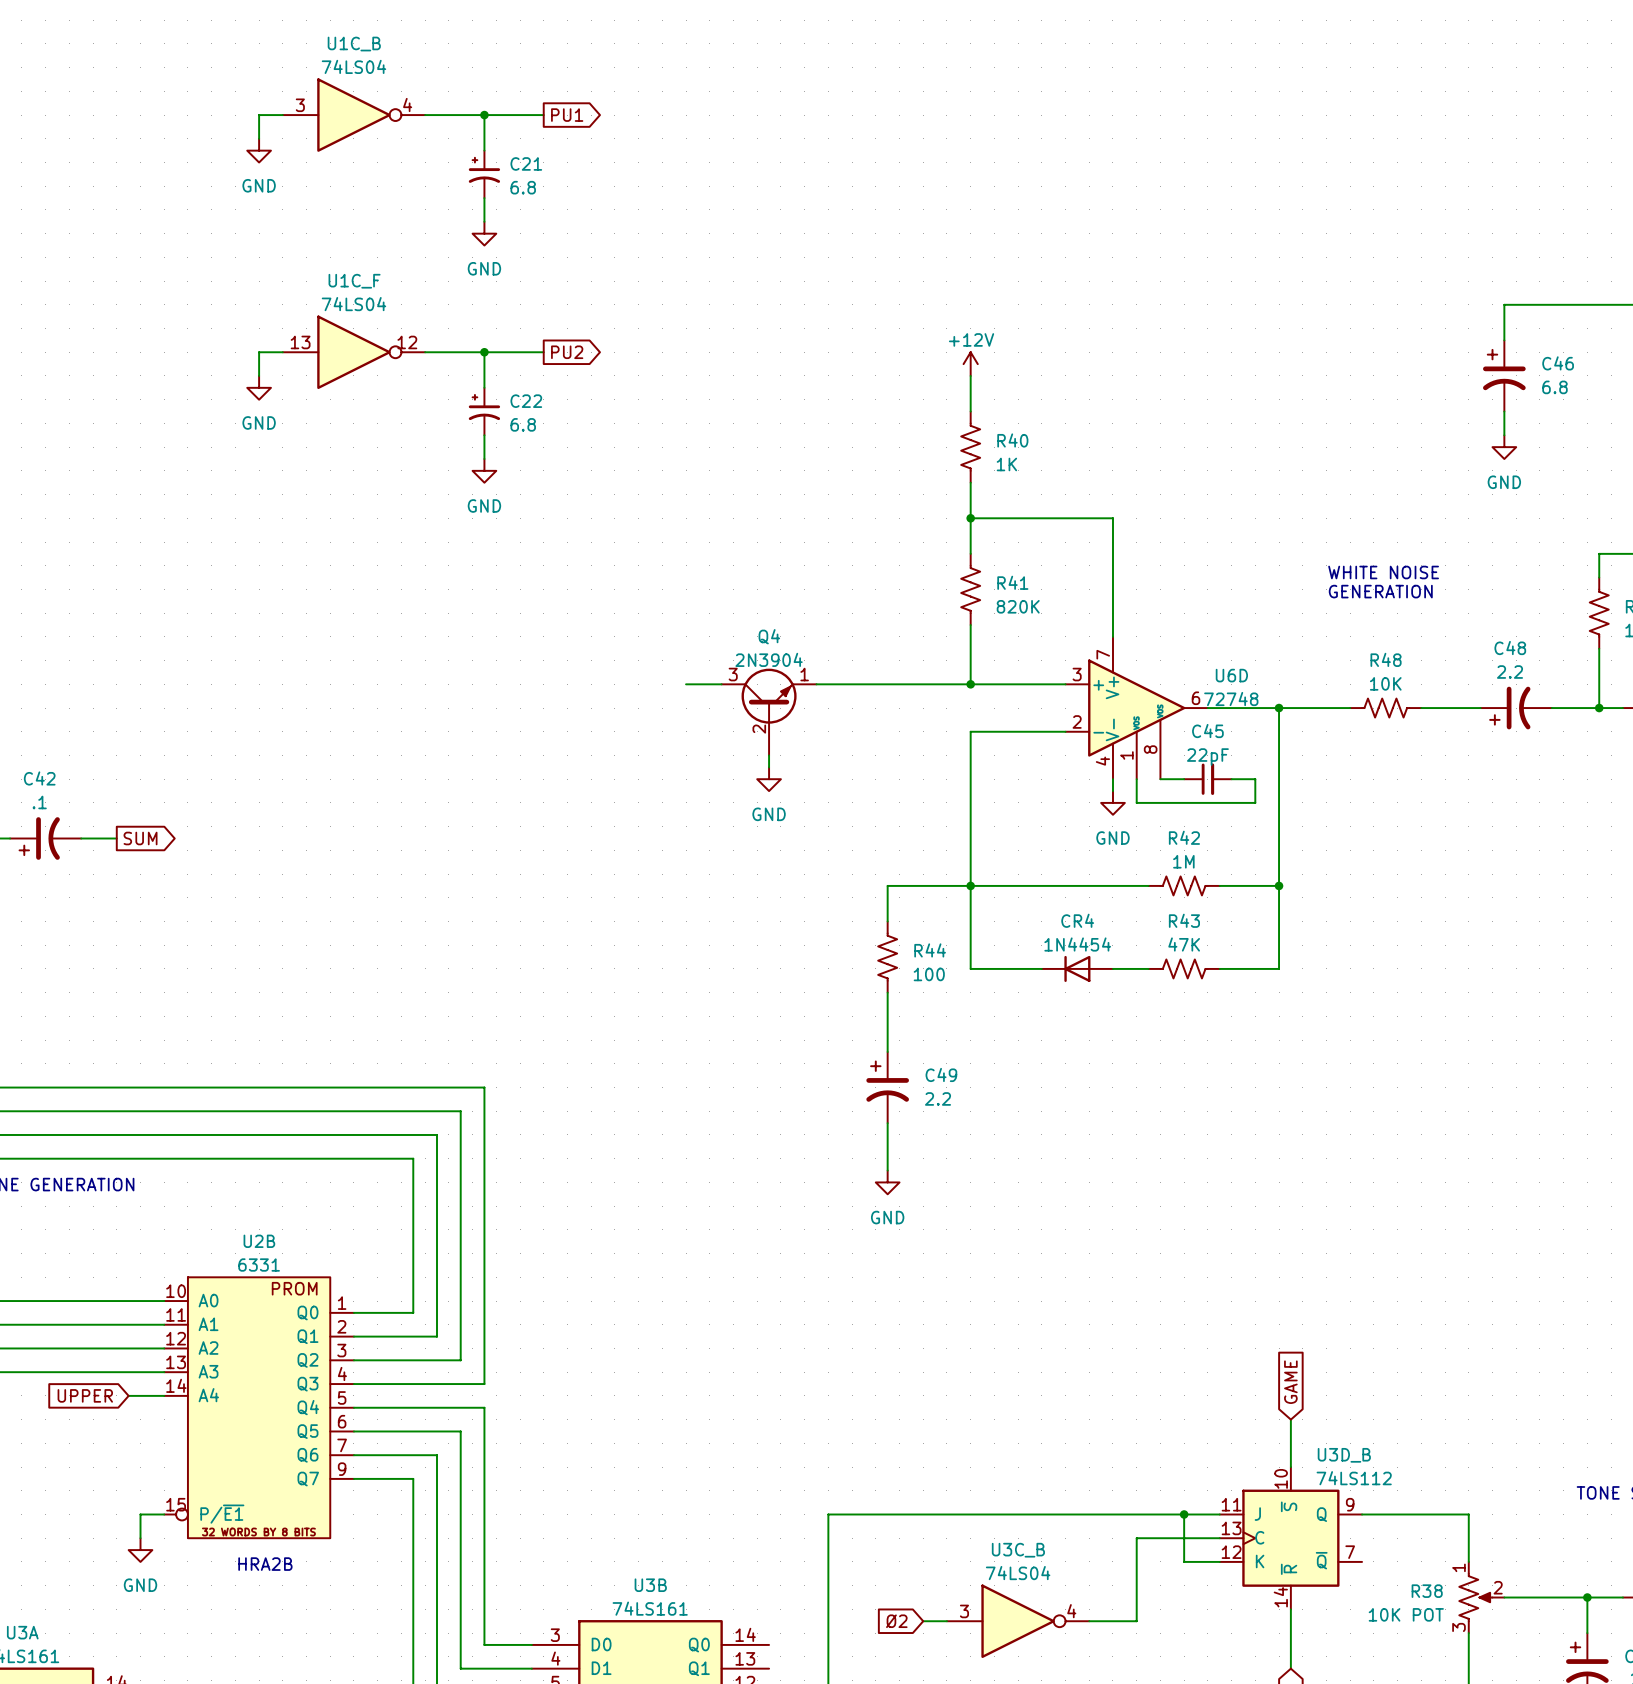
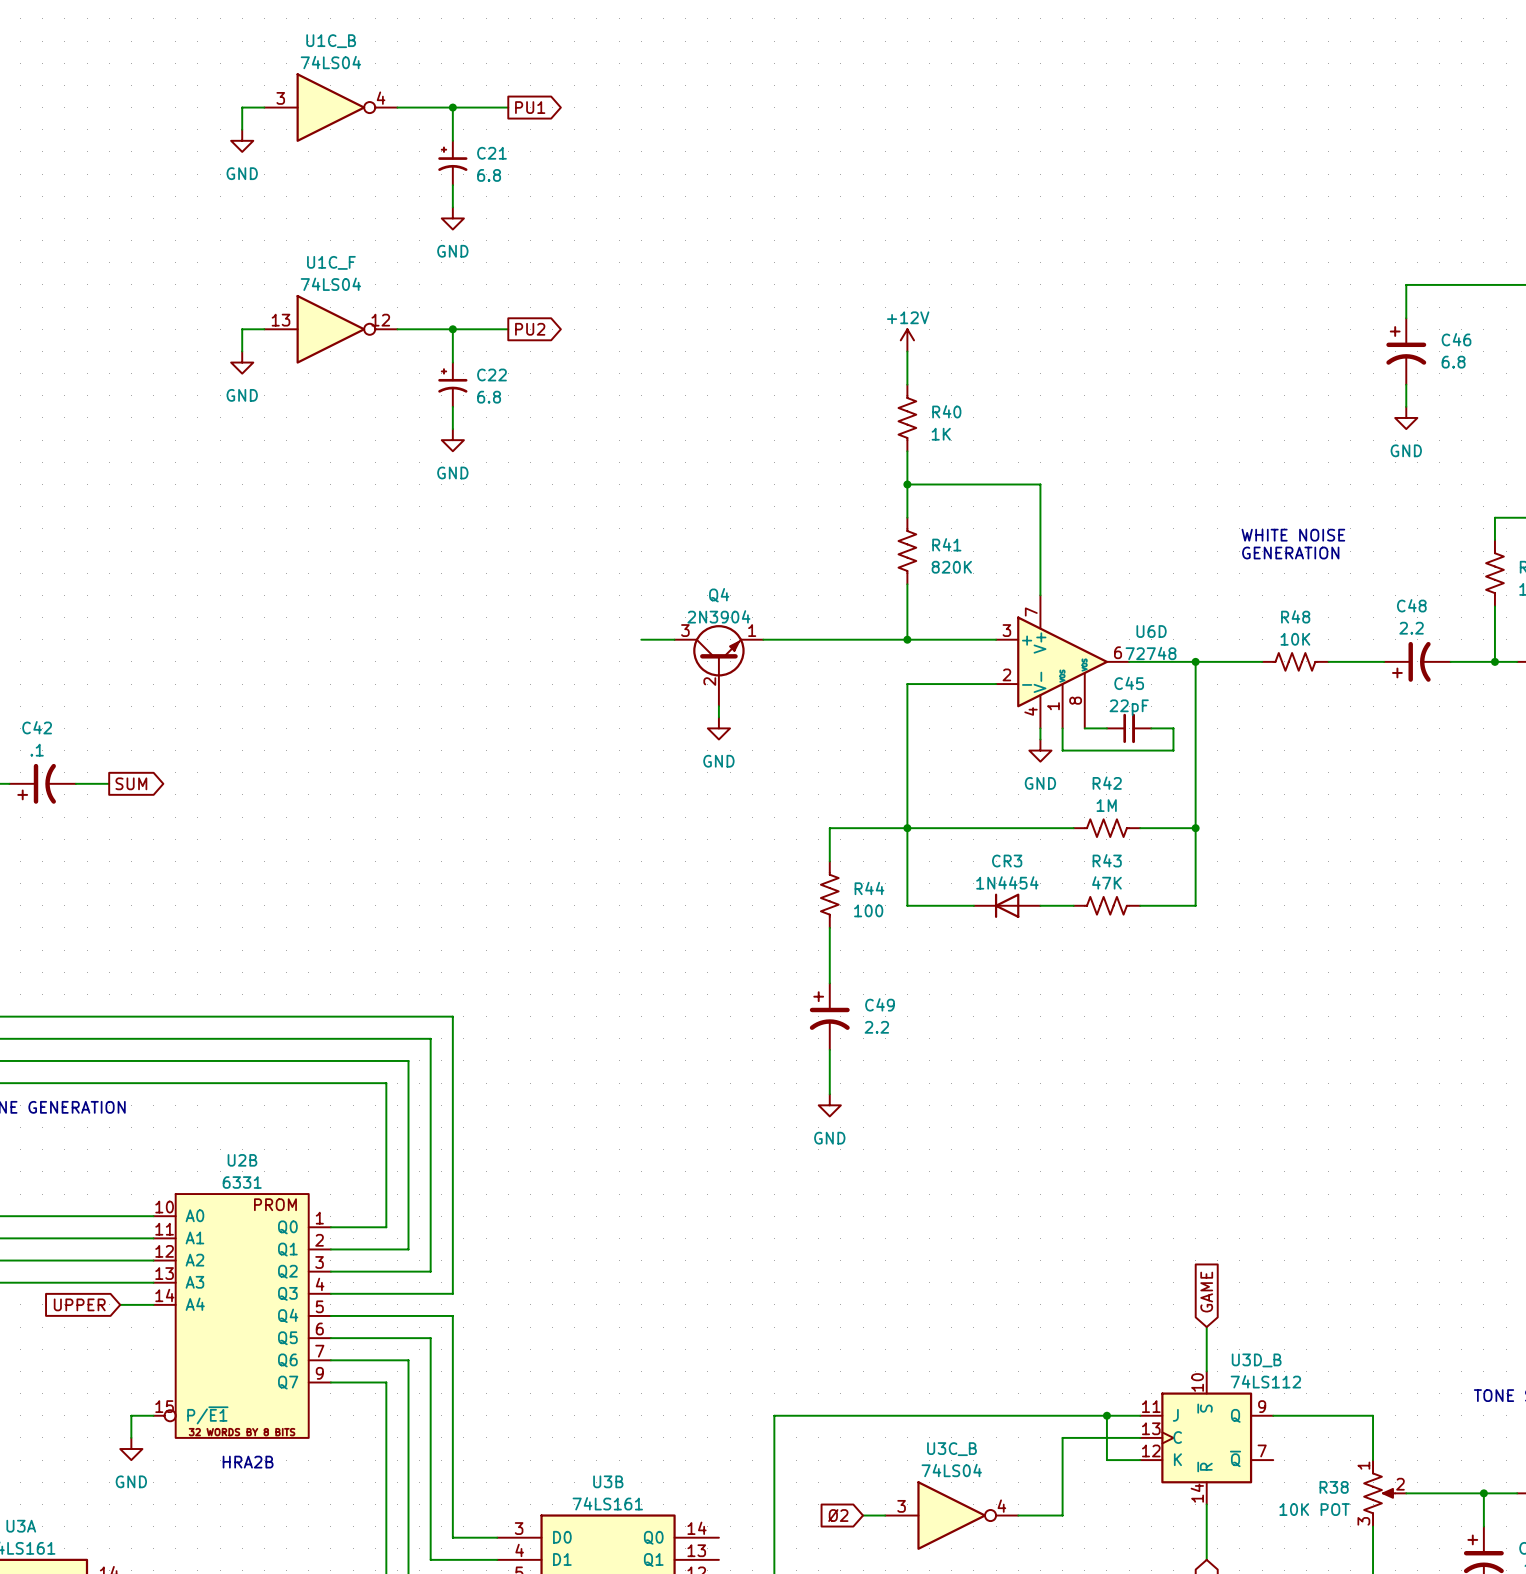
CR4 name: CR4 (1077, 920) -> CR3 (1007, 861)

